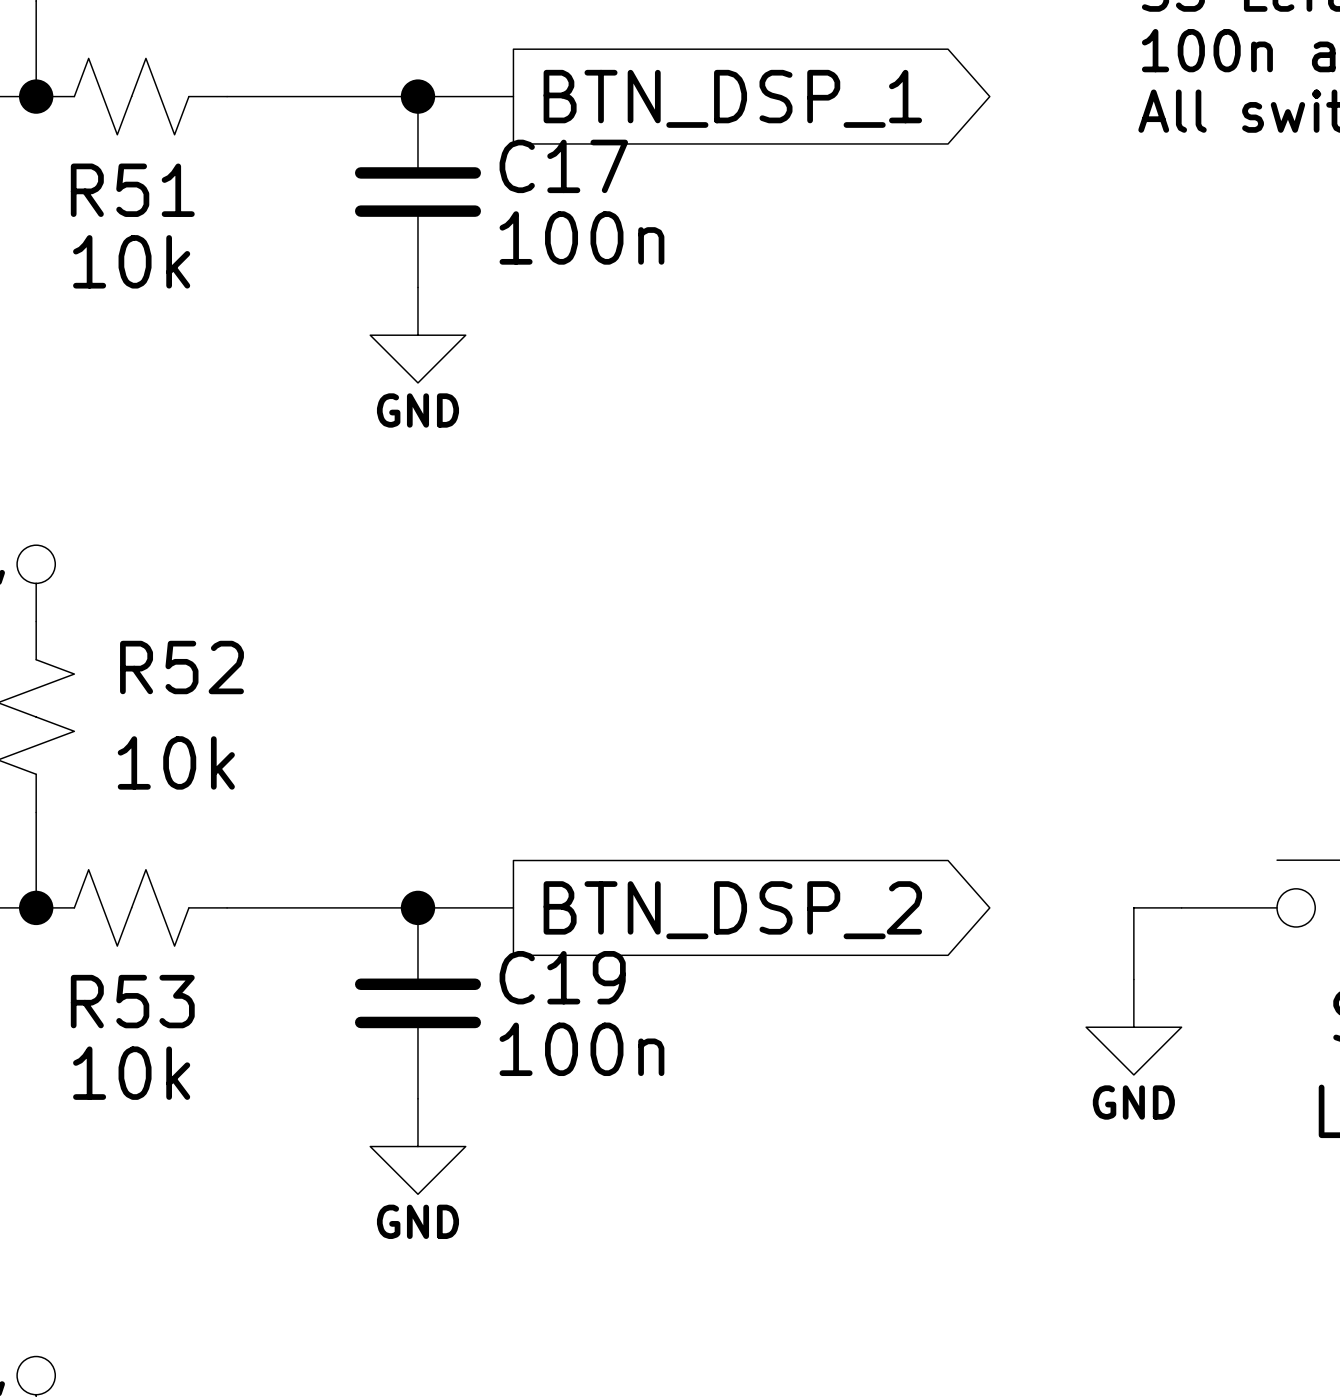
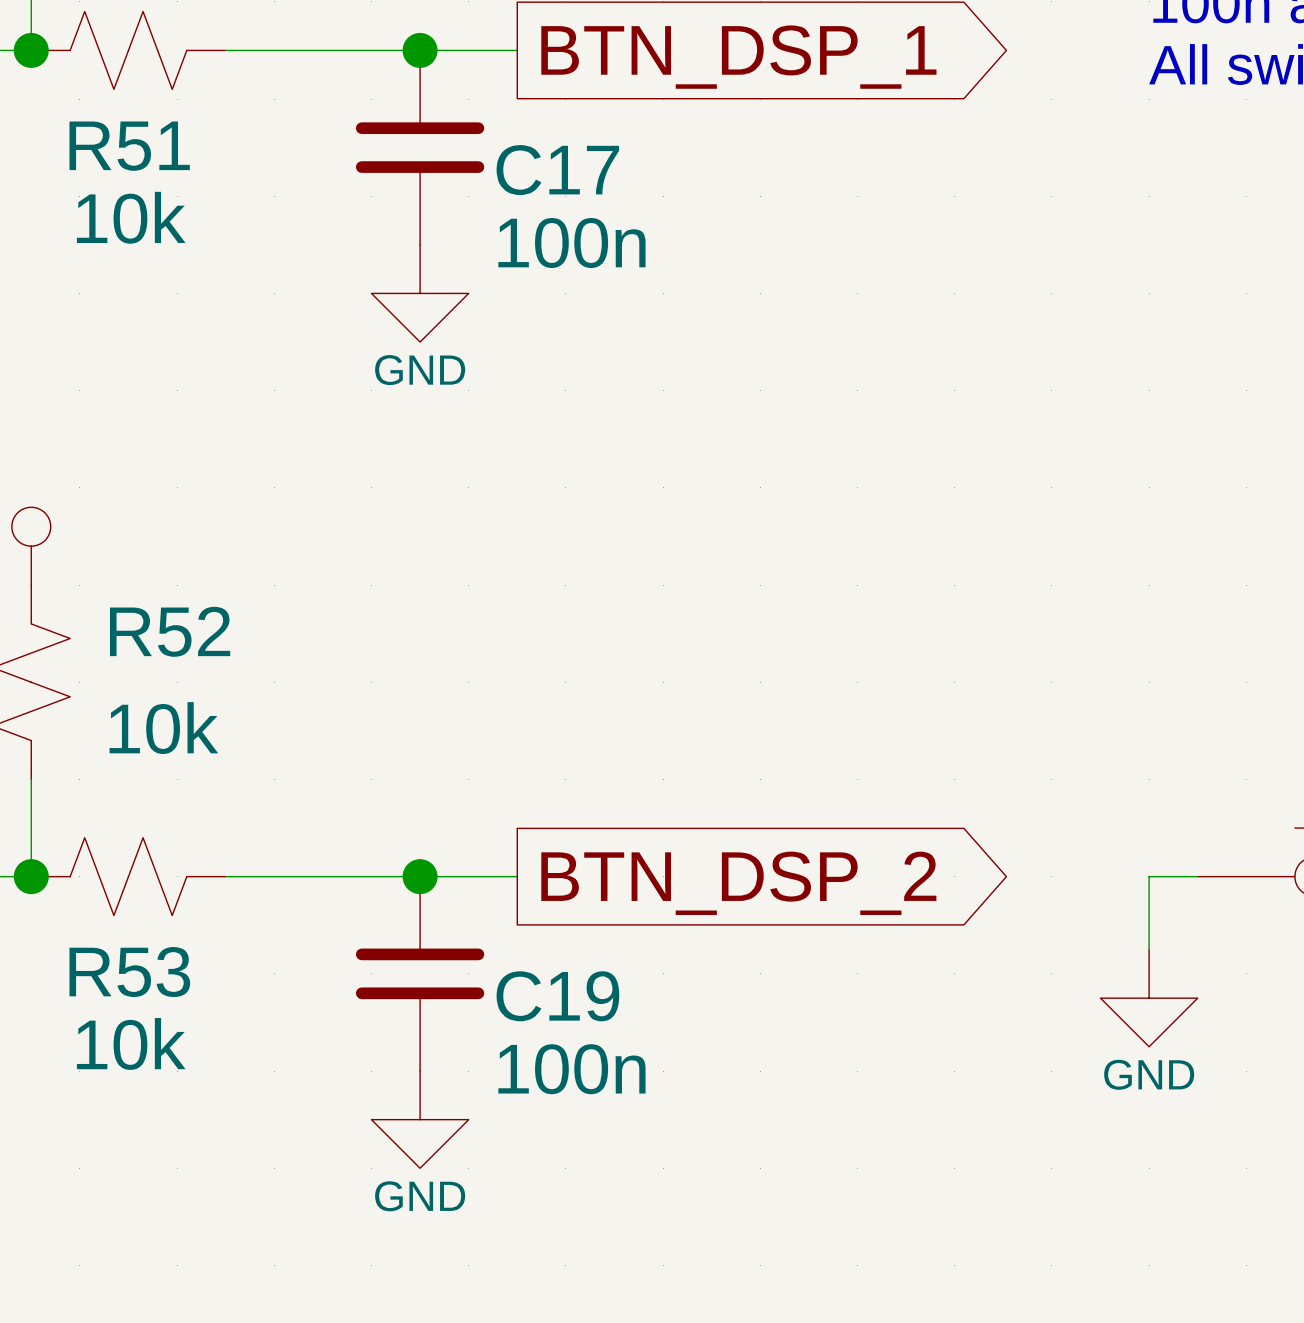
C17 name position: C17 (563, 166) -> C17 (557, 170)
C17 value position: 100n (581, 237) -> 100n (571, 243)
C19 name position: C19 (562, 977) -> C19 (557, 996)
C19 value position: 100n (581, 1049) -> 100n (571, 1069)

